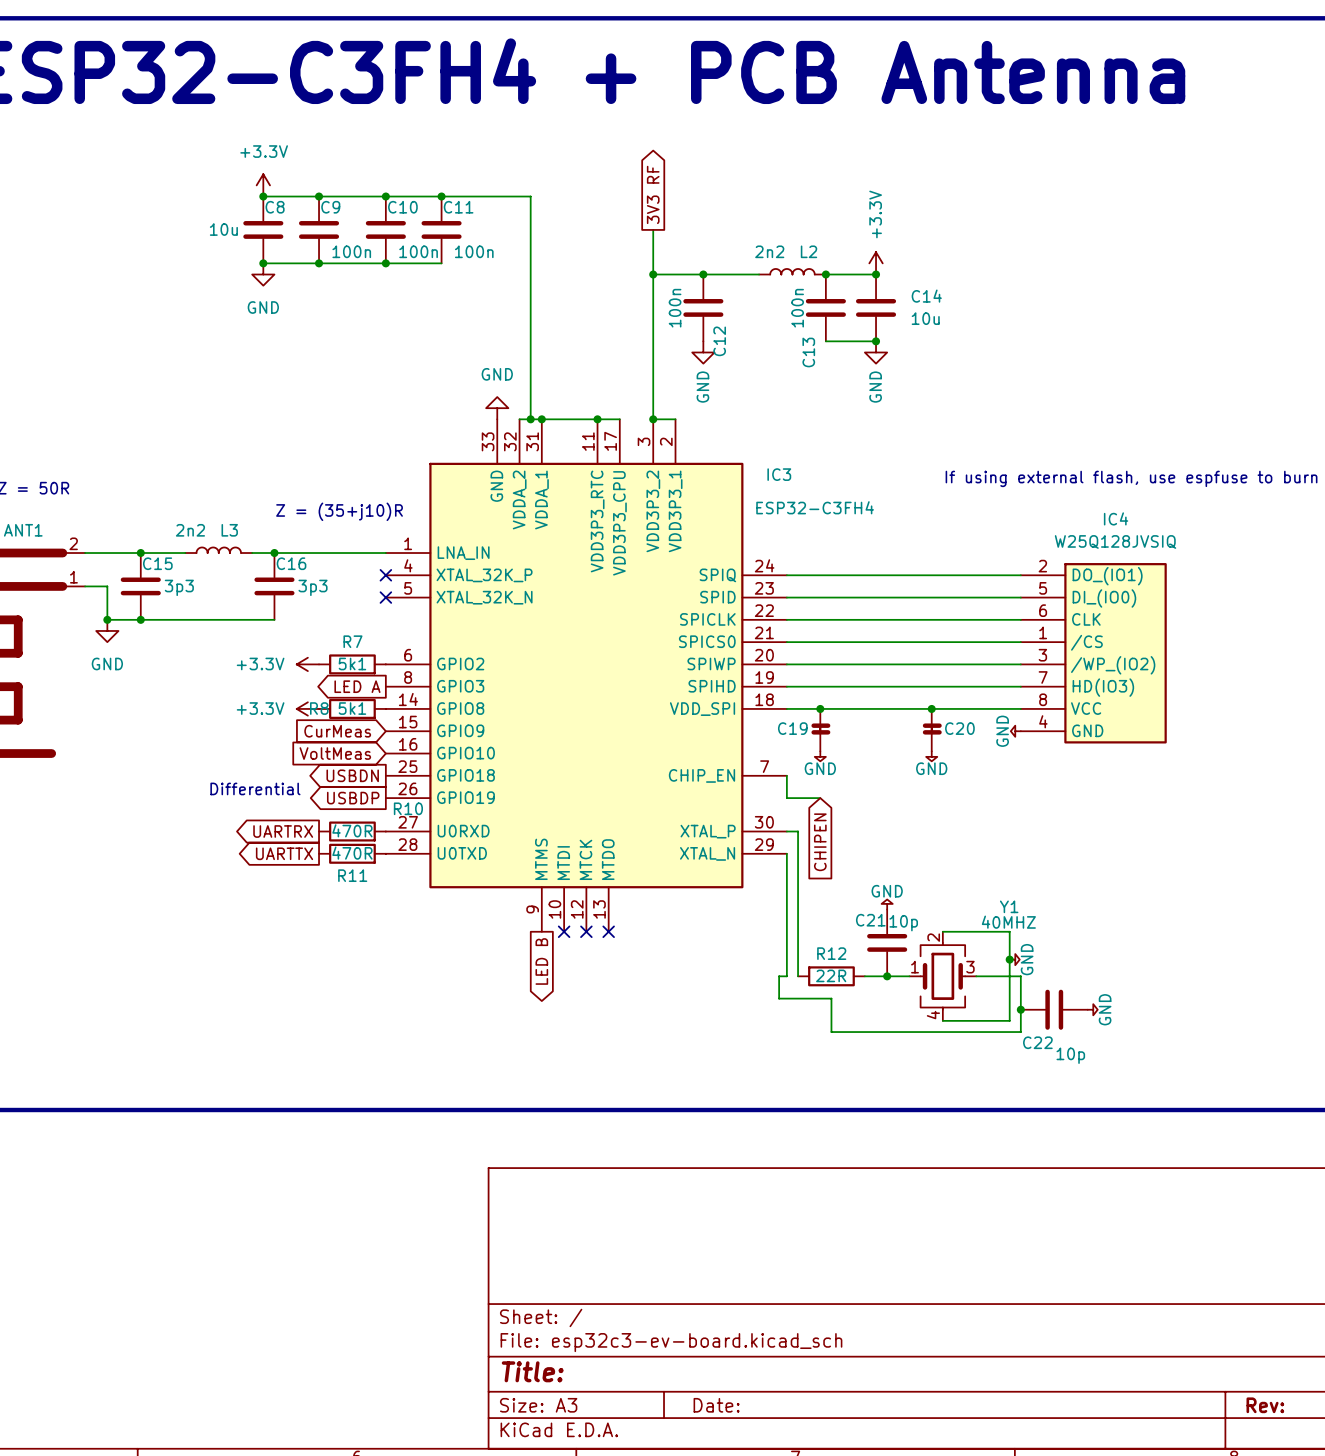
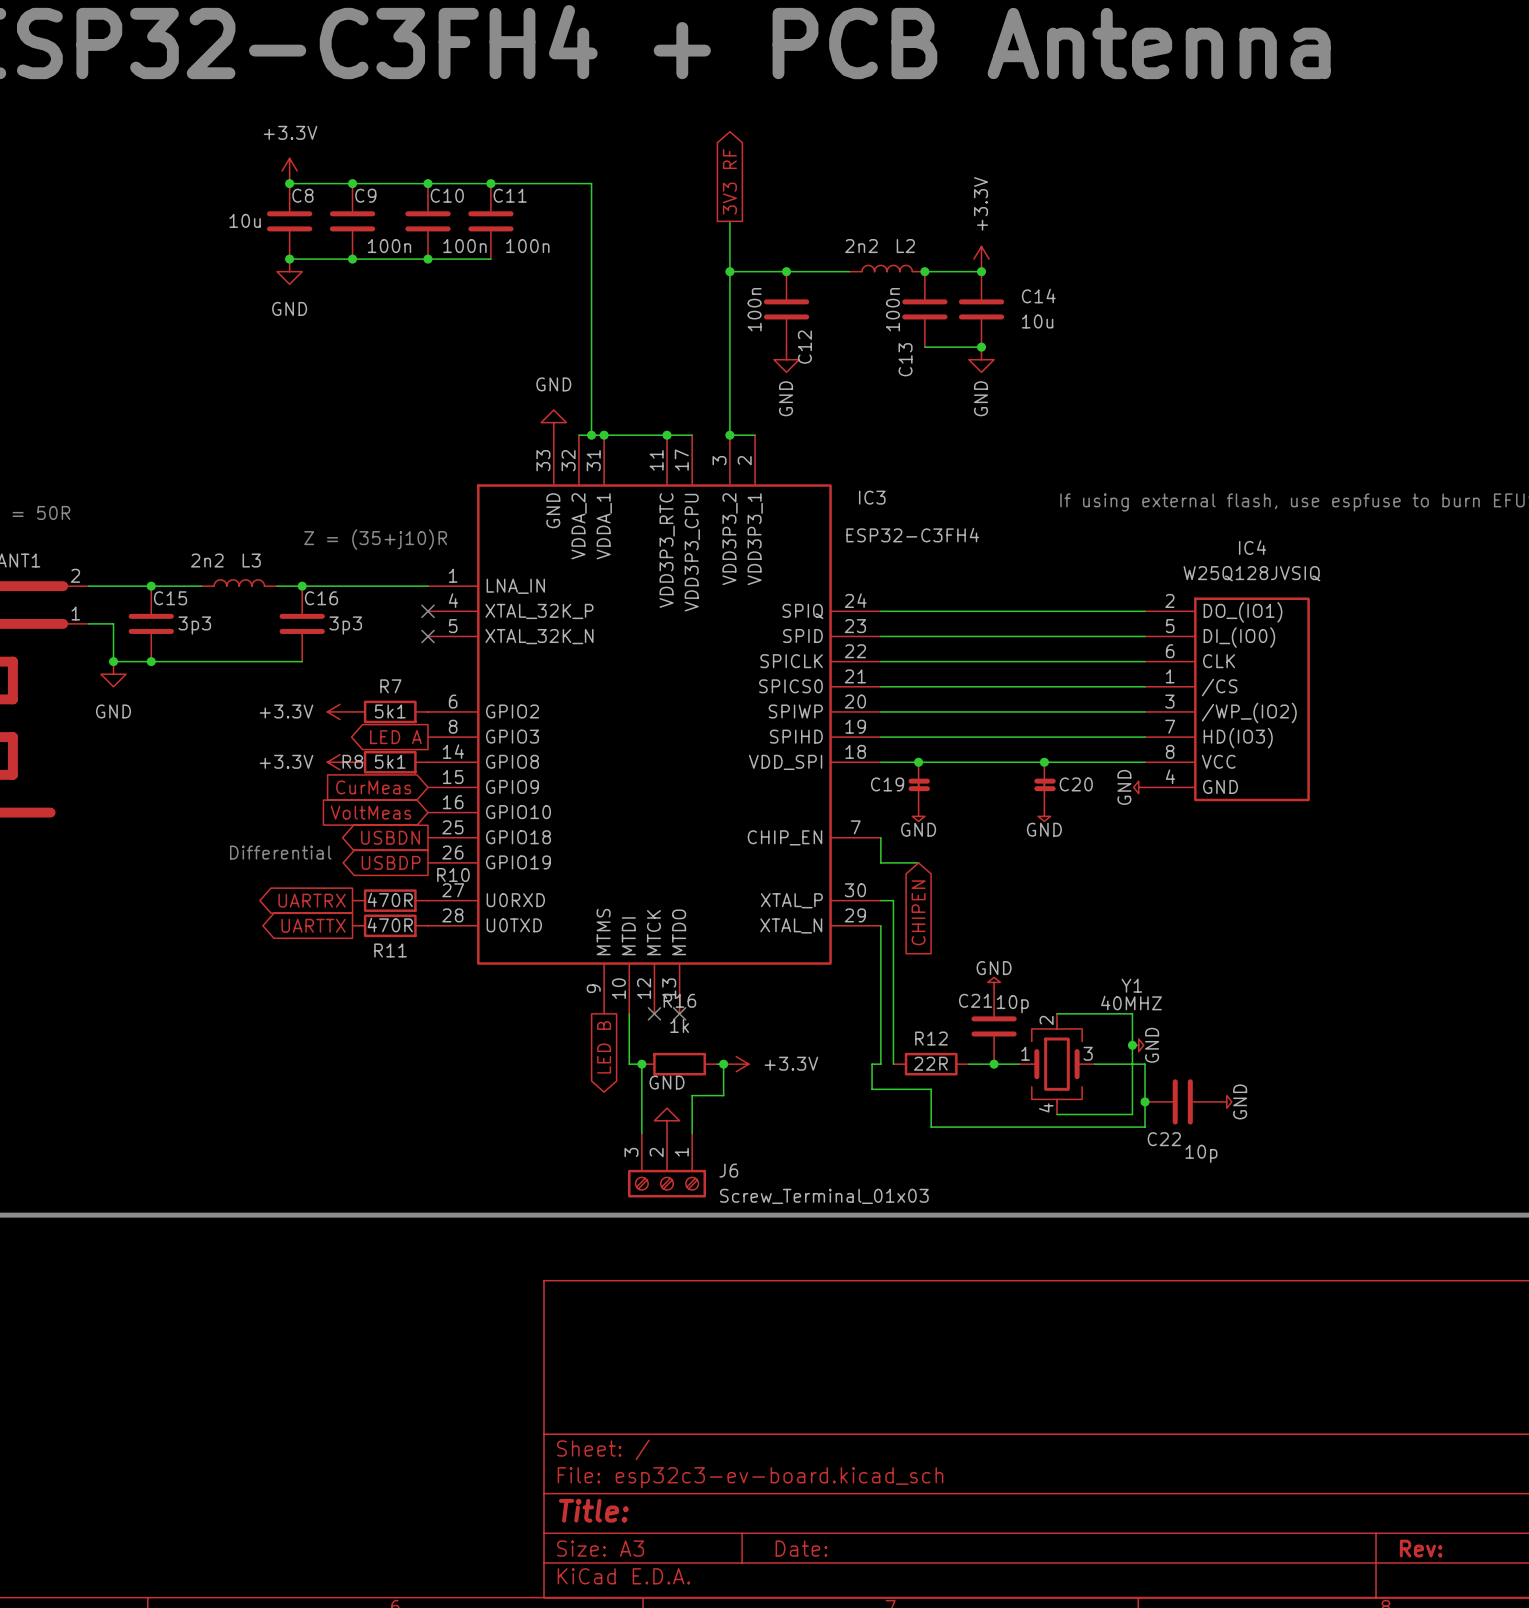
wire: none -> (629, 1013) (629, 1064) (641, 1064) (641, 1133)
no-connect mark: (564, 931) -> none
junction: none -> (641, 1064)
R16: none -> 1k (679, 1064)
wire: none -> (717, 1064) (723, 1064) (723, 1095) (692, 1095) (692, 1133)
junction: none -> (723, 1064)
power symbol: none -> +3.3V (736, 1064)
power symbol: none -> GND (667, 1120)
J6: none -> Screw_Terminal_01x03 (667, 1165)

